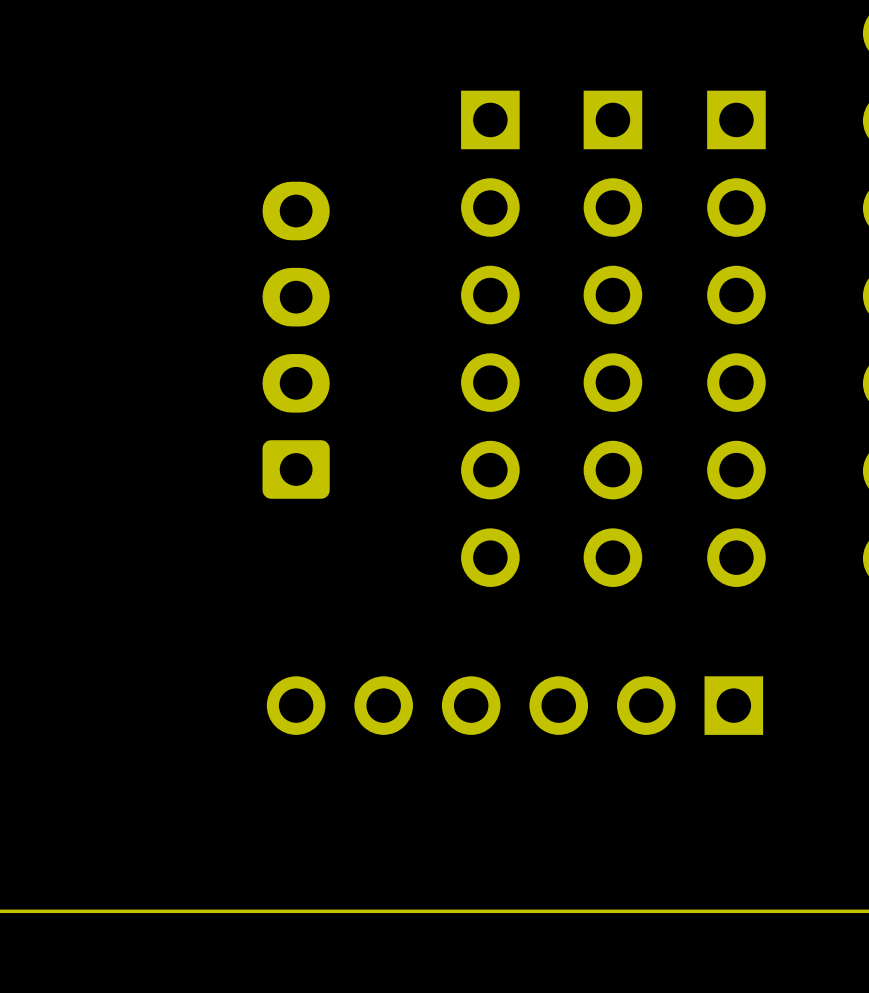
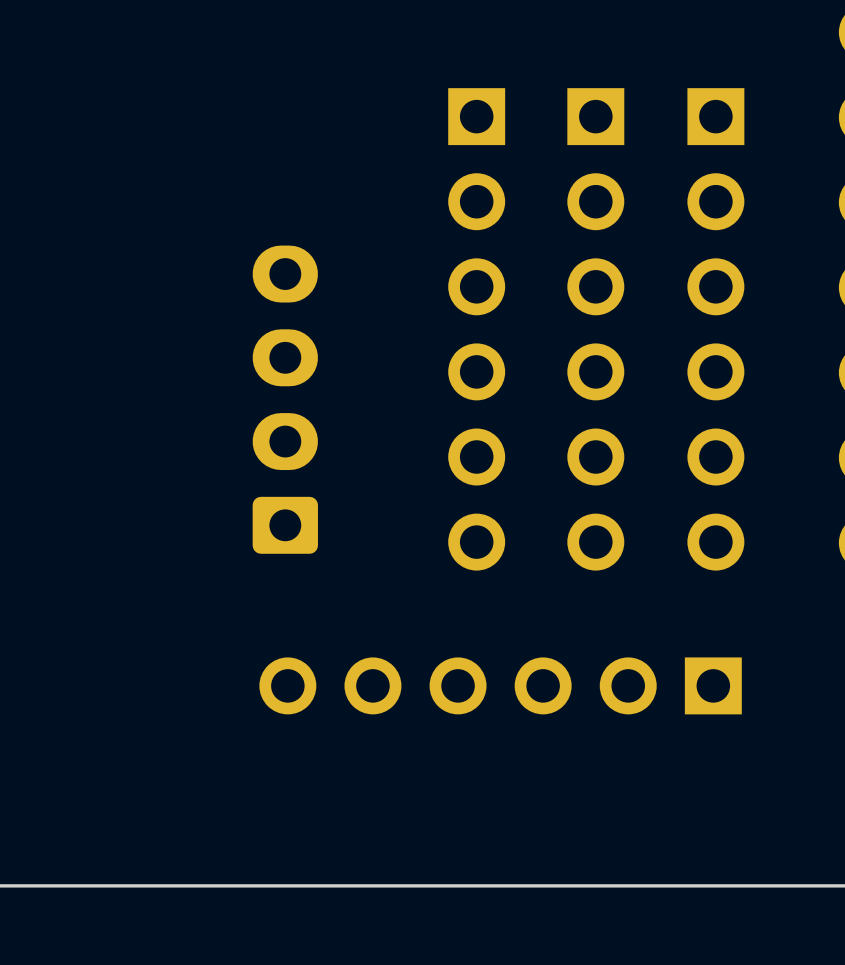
part position: (296, 340) -> (285, 399)

